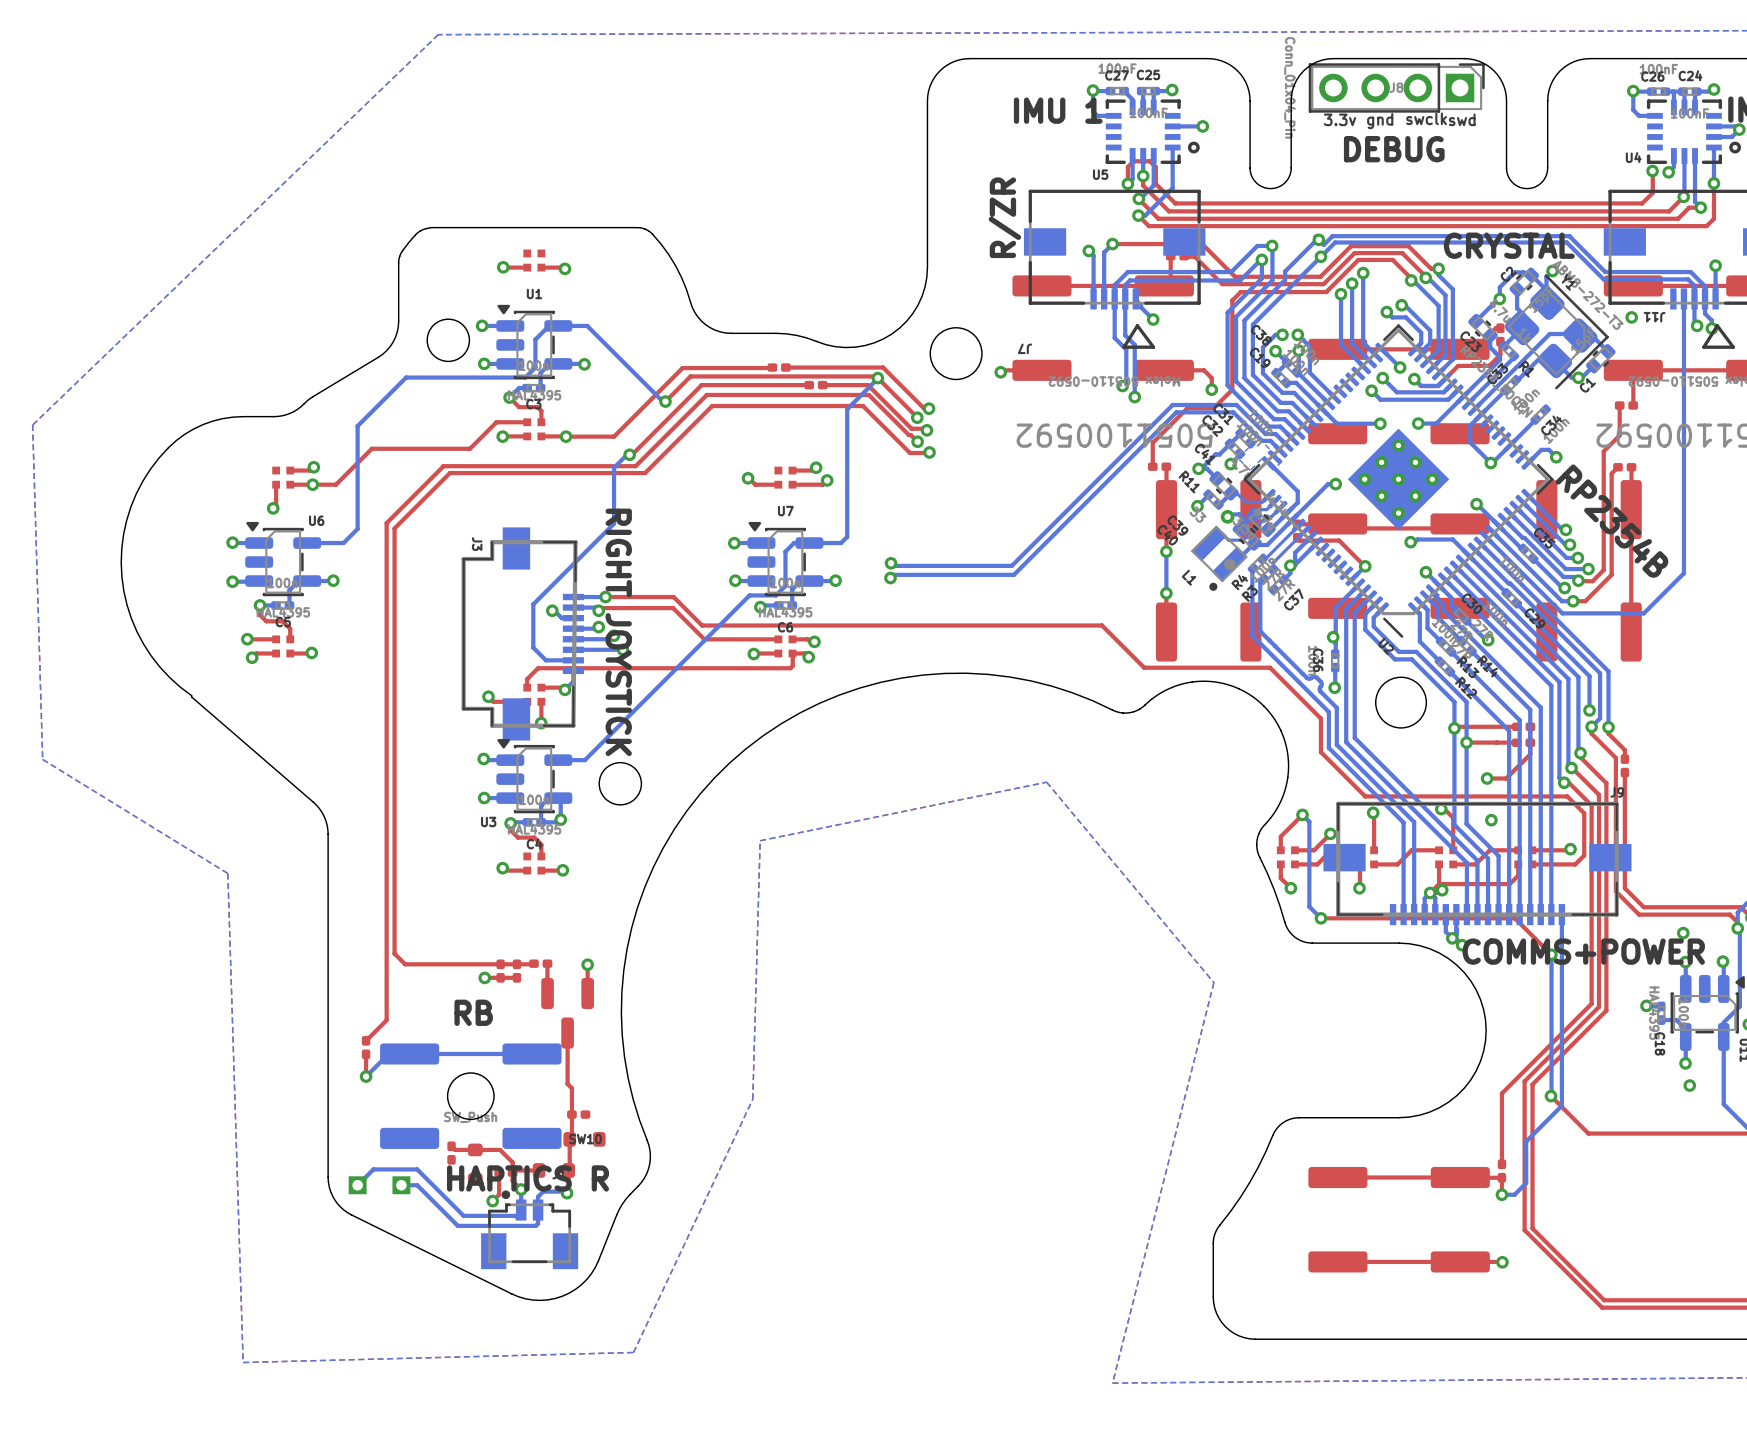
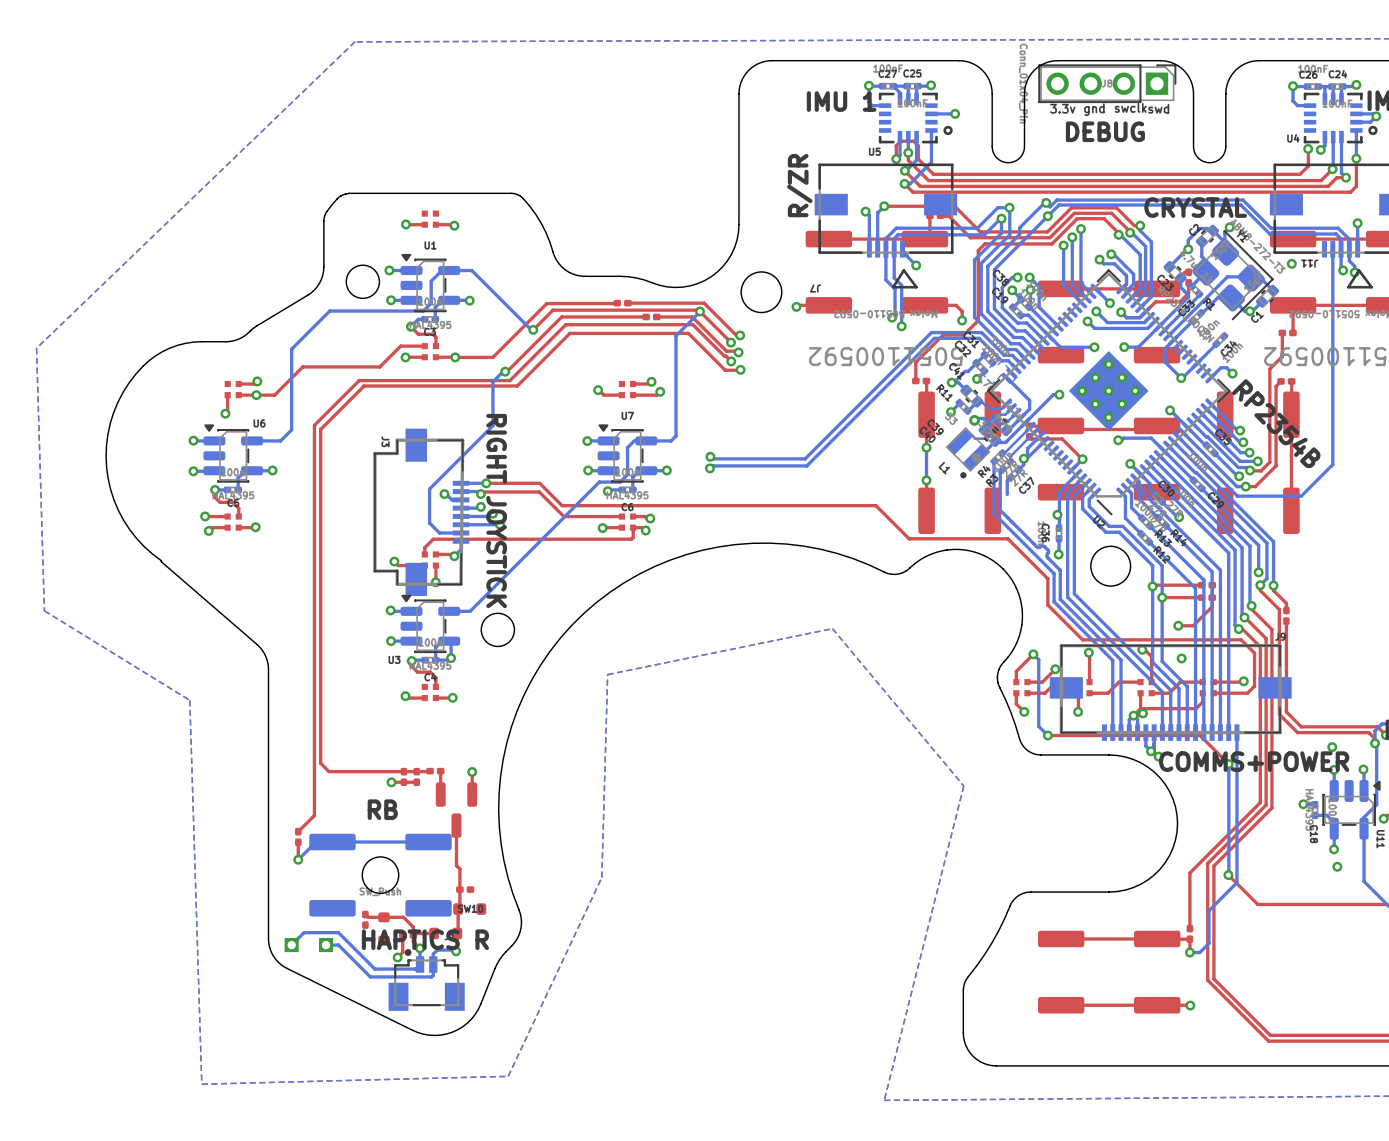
bottom track: none -> (907, 86) (893, 86)
bottom track: none -> (1010, 477) (1007, 480) (1007, 494)

